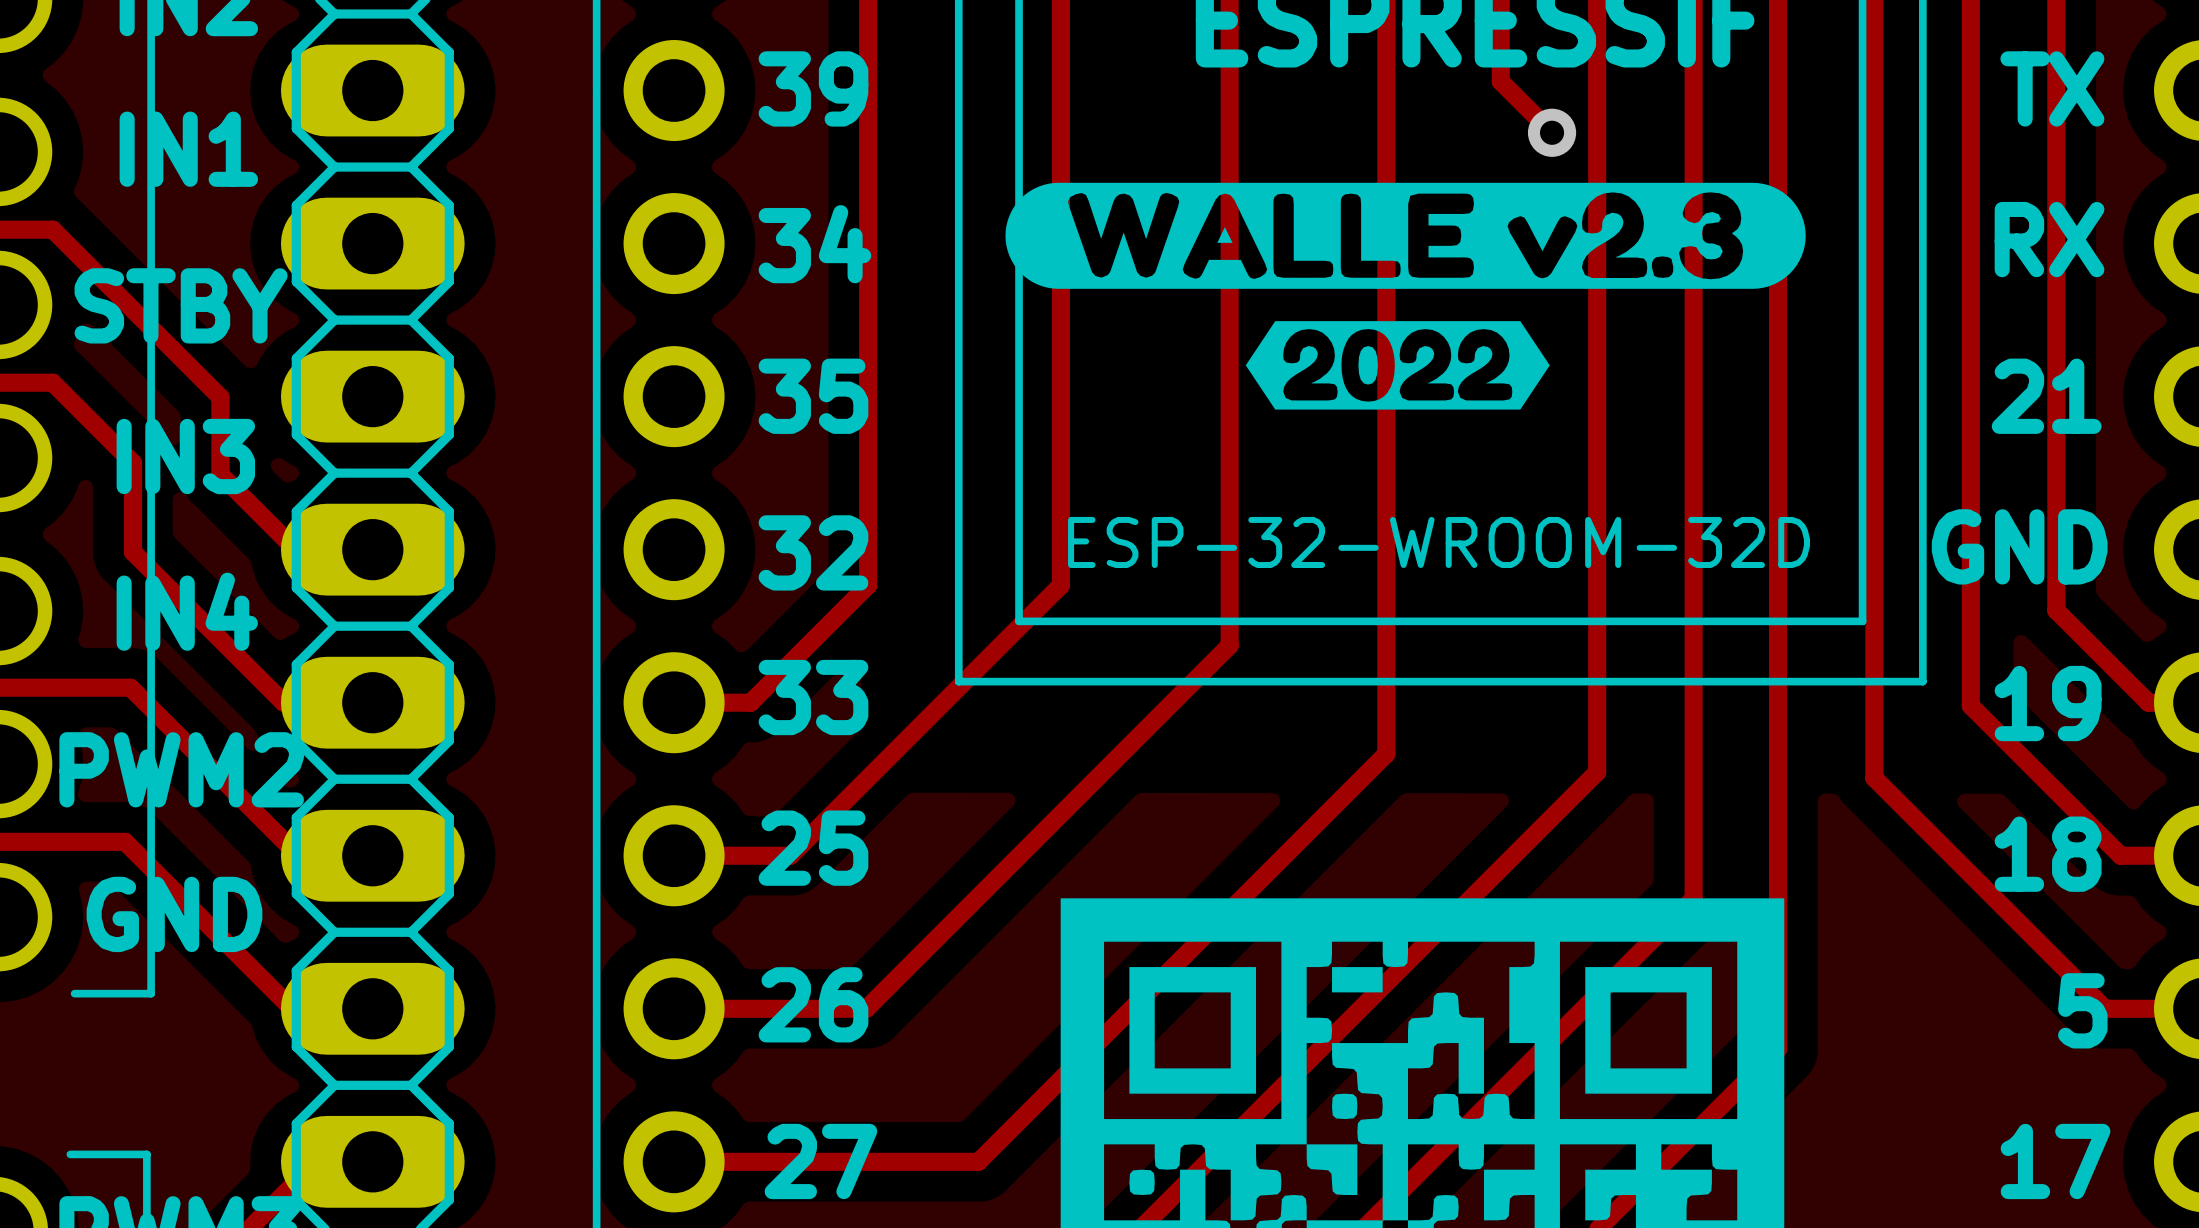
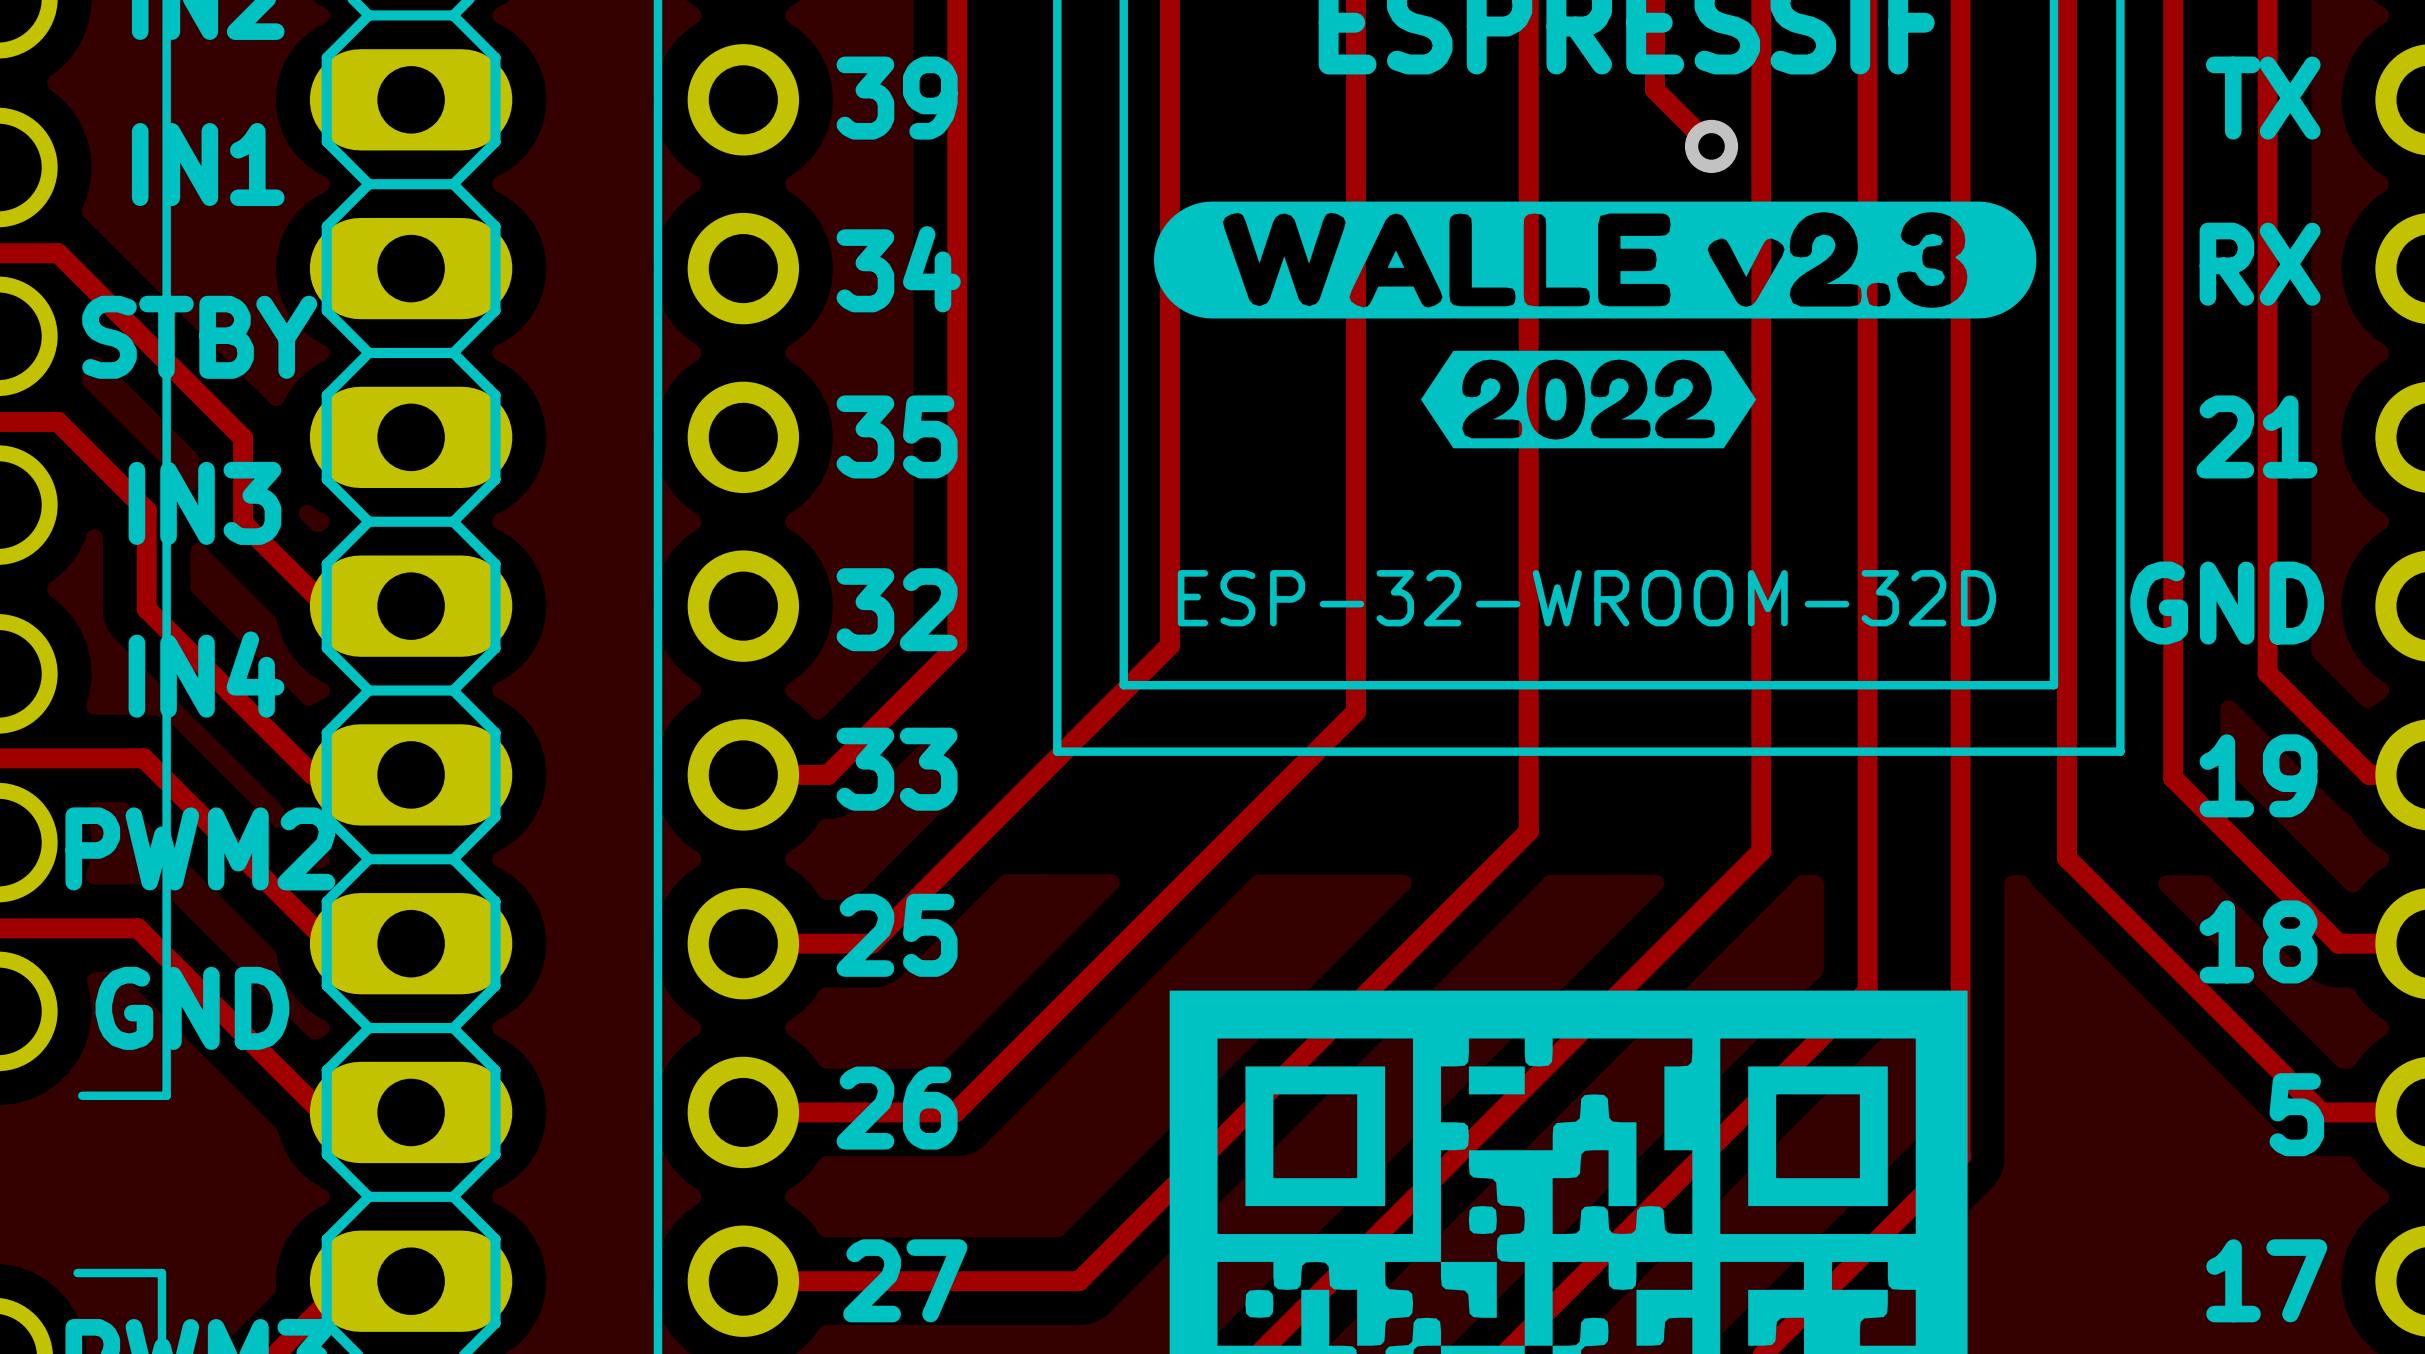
drawing position: (1405, 235) -> (1595, 260)
drawing position: (1397, 365) -> (1588, 399)

